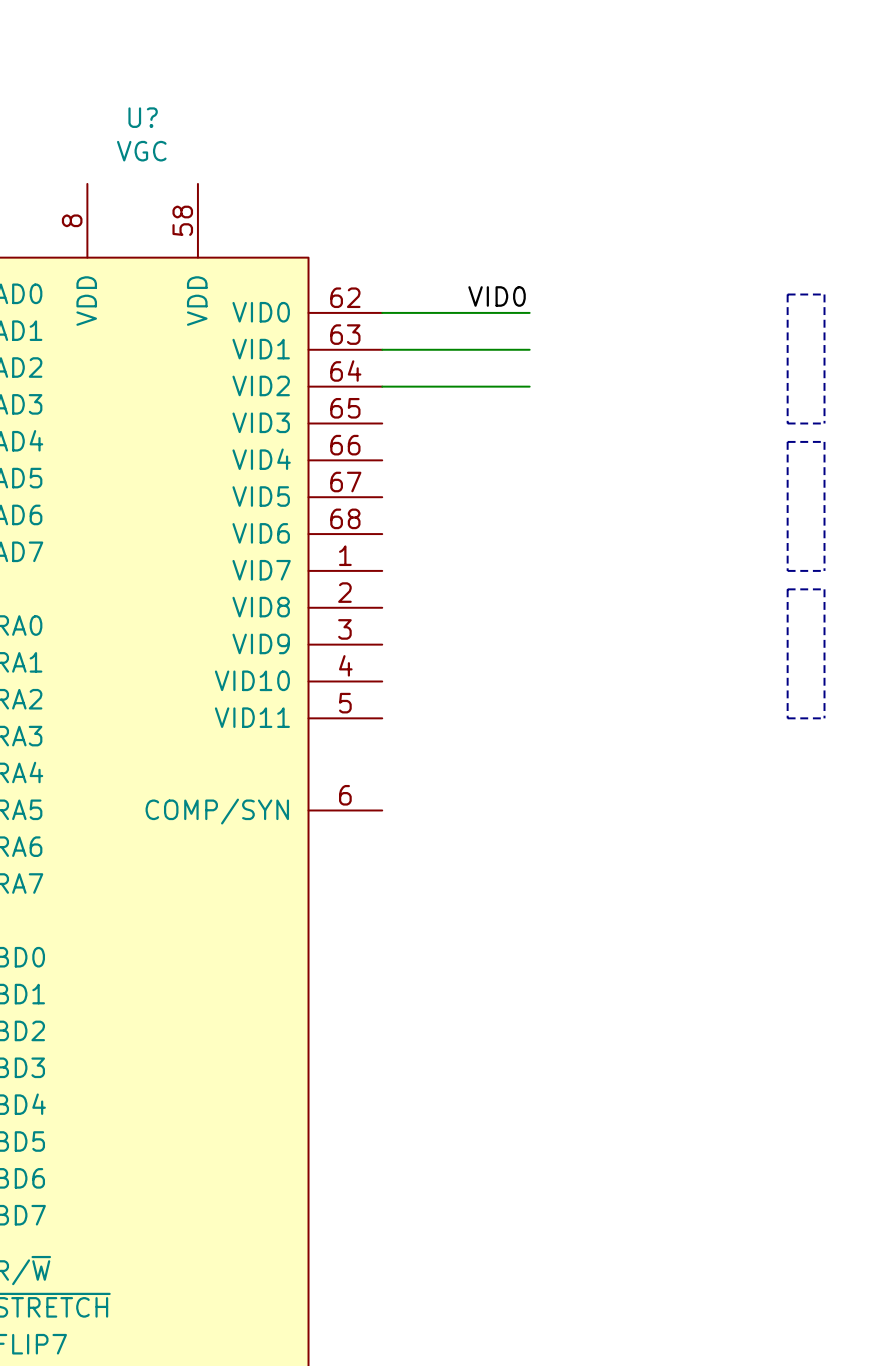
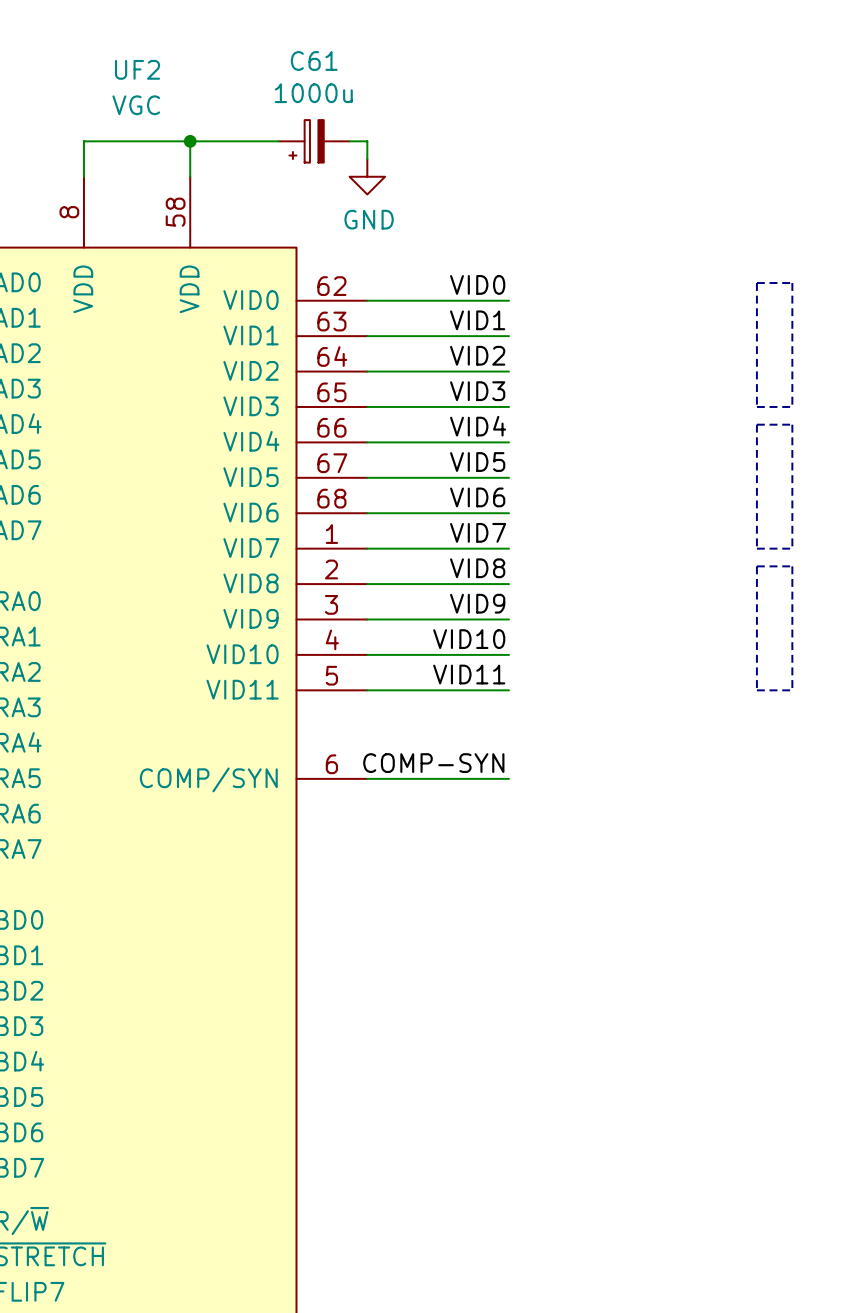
U? name: U? (143, 117) -> UF2 (137, 69)
wire: none -> (190, 141) (190, 176)
junction: none -> (190, 141)
wire: none -> (278, 141) (83, 141) (83, 176)
C61: none -> 1000u (314, 141)
wire: none -> (349, 141) (367, 141) (367, 159)
U? value position: VGC (141, 151) -> VGC (136, 105)
power symbol: none -> GND (367, 176)
label: none -> VID1 (477, 320)
label: none -> VID2 (477, 355)
label: none -> VID3 (477, 391)
wire: none -> (367, 406) (509, 406)
label: none -> VID4 (478, 426)
wire: none -> (367, 442) (509, 442)
label: none -> VID5 (477, 462)
wire: none -> (367, 477) (509, 477)
label: none -> VID6 (477, 497)
wire: none -> (367, 513) (509, 513)
label: none -> VID7 (478, 532)
wire: none -> (367, 548) (509, 548)
label: none -> VID8 (477, 568)
wire: none -> (367, 584) (509, 584)
label: none -> VID9 (477, 603)
wire: none -> (367, 619) (509, 619)
label: none -> VID10 (469, 639)
wire: none -> (367, 654) (509, 654)
label: none -> VID11 (469, 674)
wire: none -> (367, 690) (509, 690)
label: none -> COMP-SYN (433, 763)
wire: none -> (367, 778) (509, 778)

